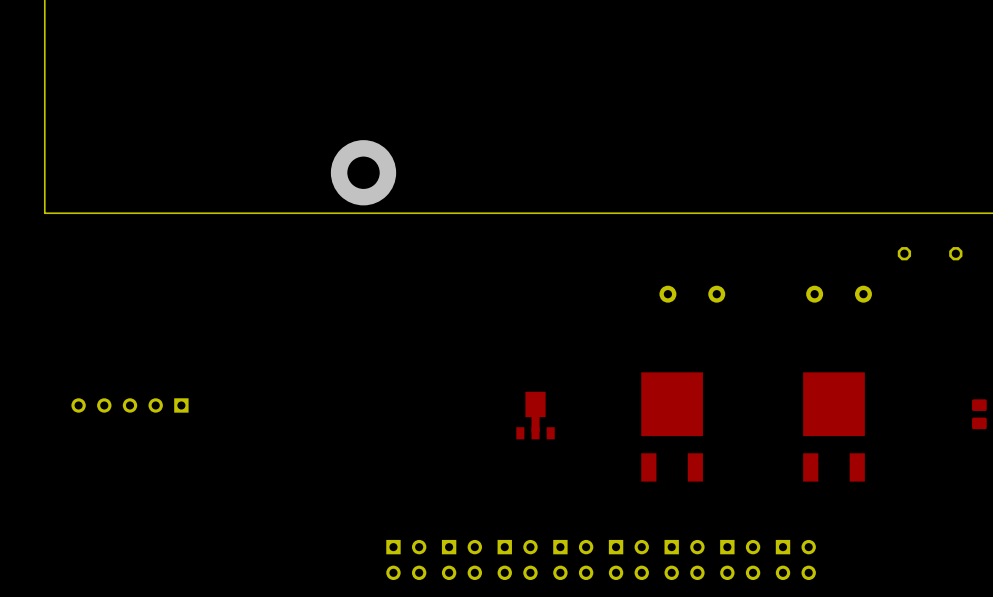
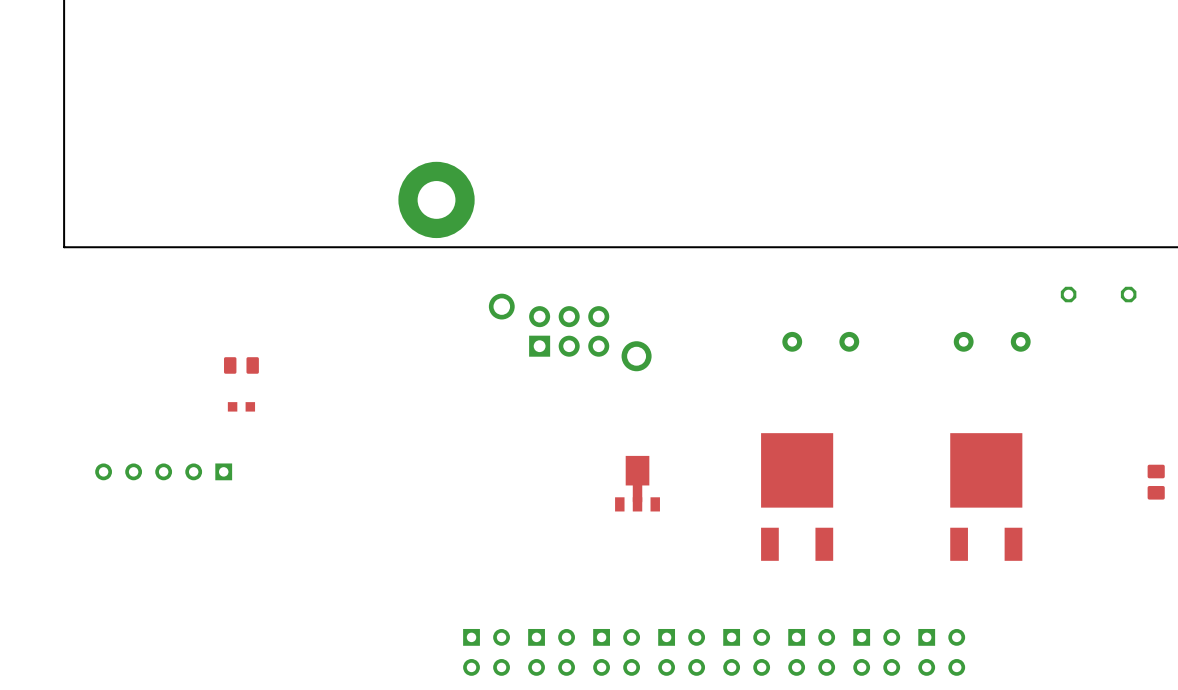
part: none -> (570, 332)
part: none -> (241, 365)
part: none -> (241, 406)

